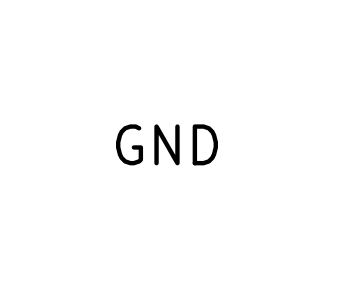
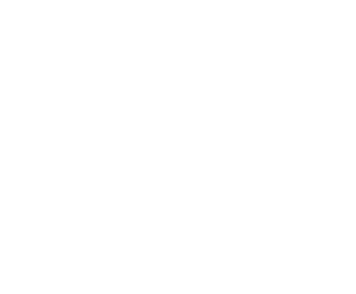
label: GND (166, 144) -> none

